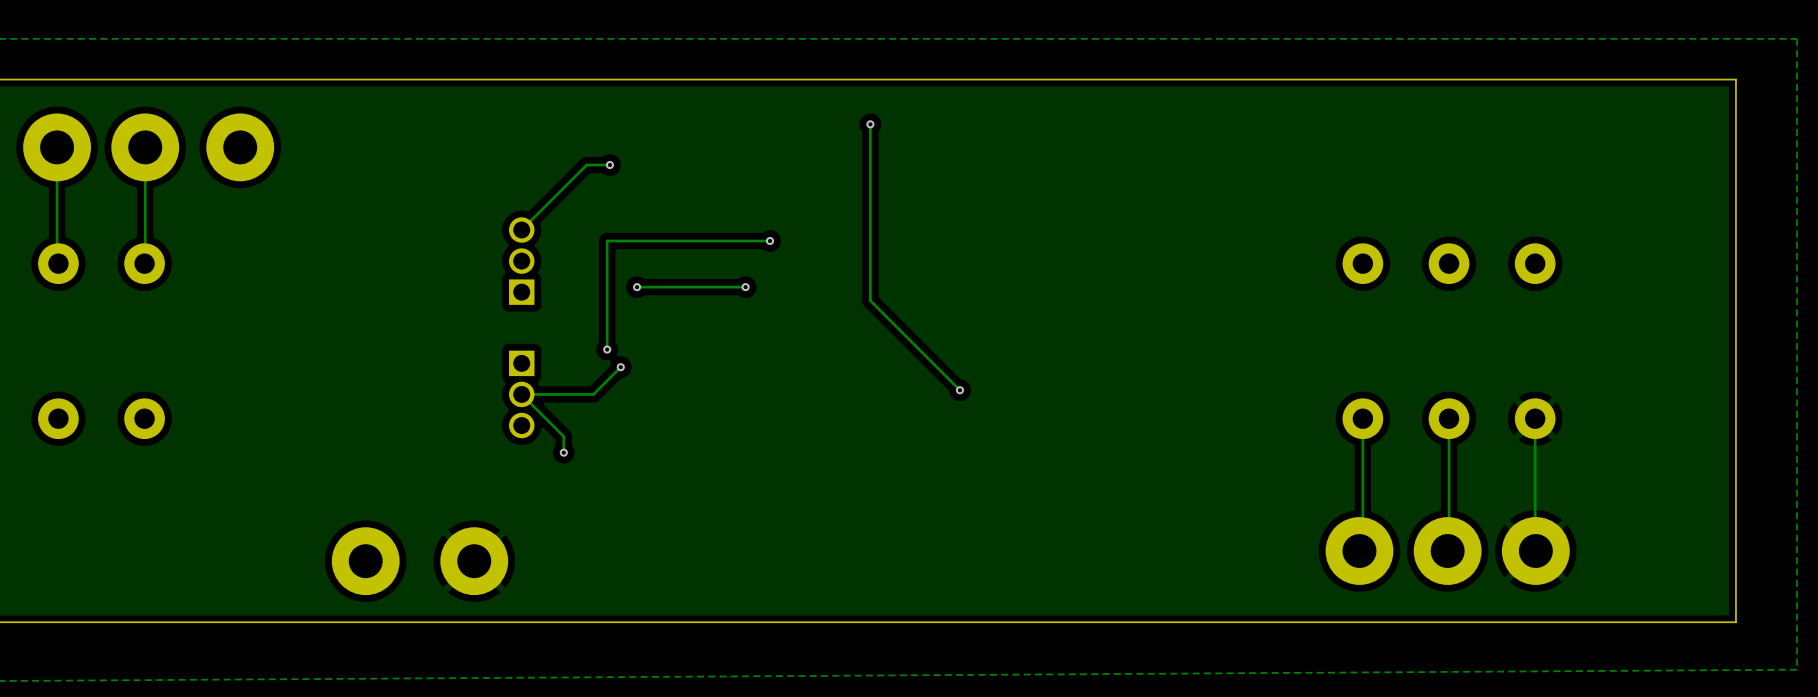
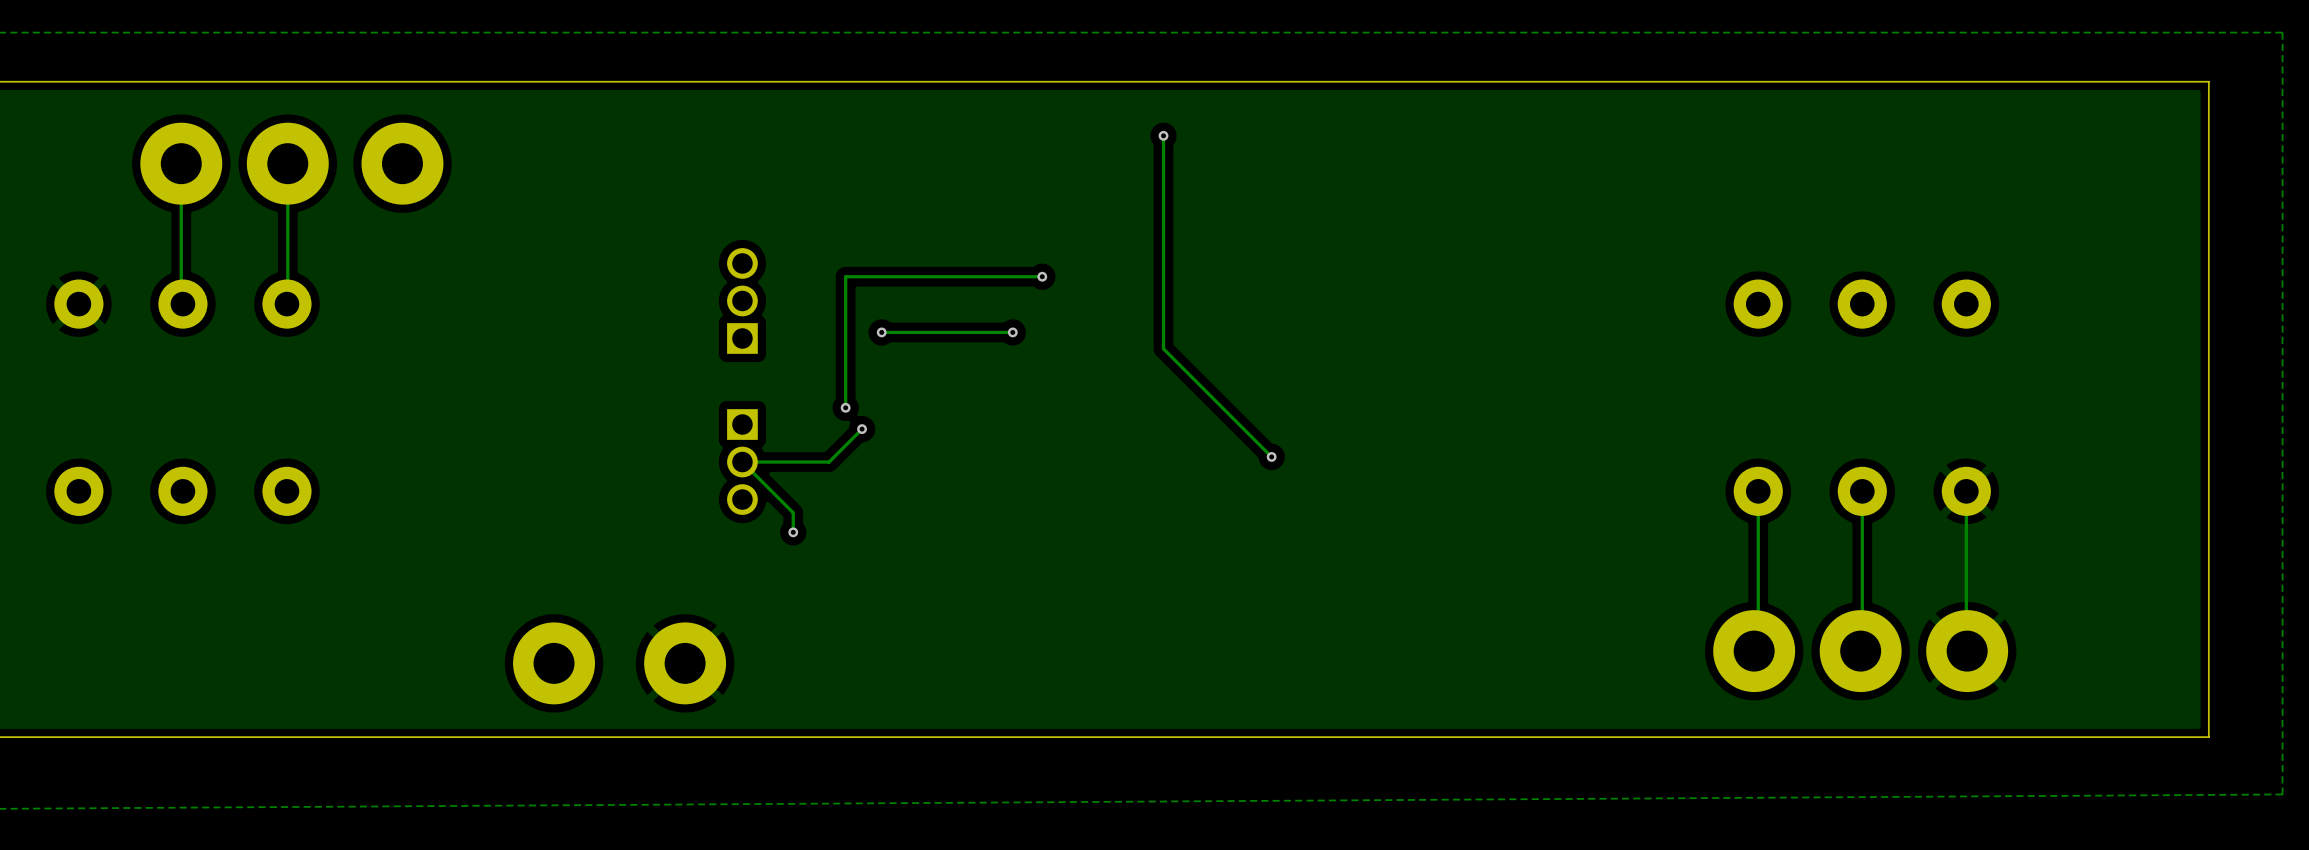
track: (609, 165) (586, 165) (521, 230) -> none
via: (609, 165) -> none

